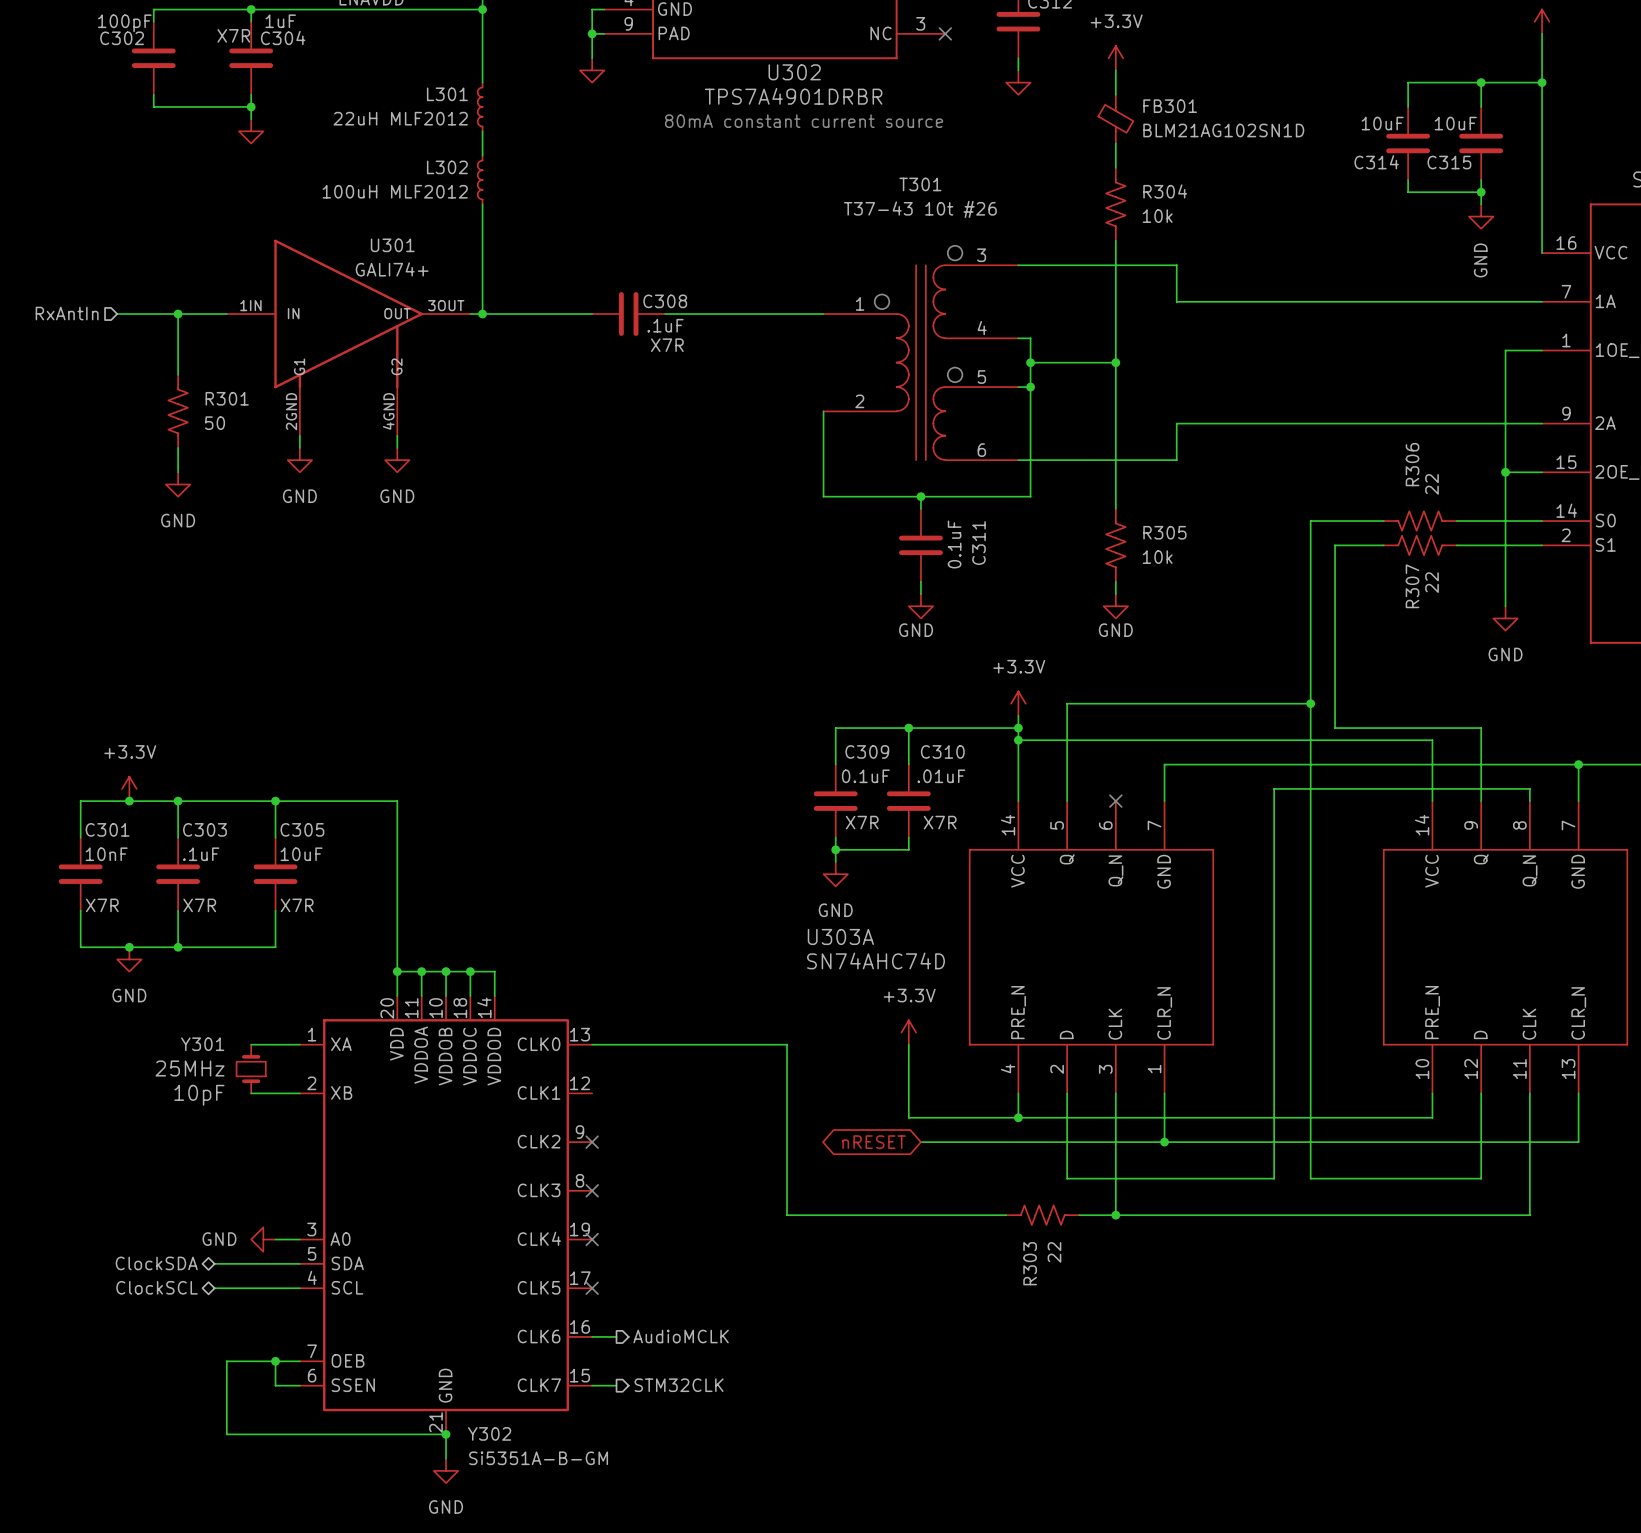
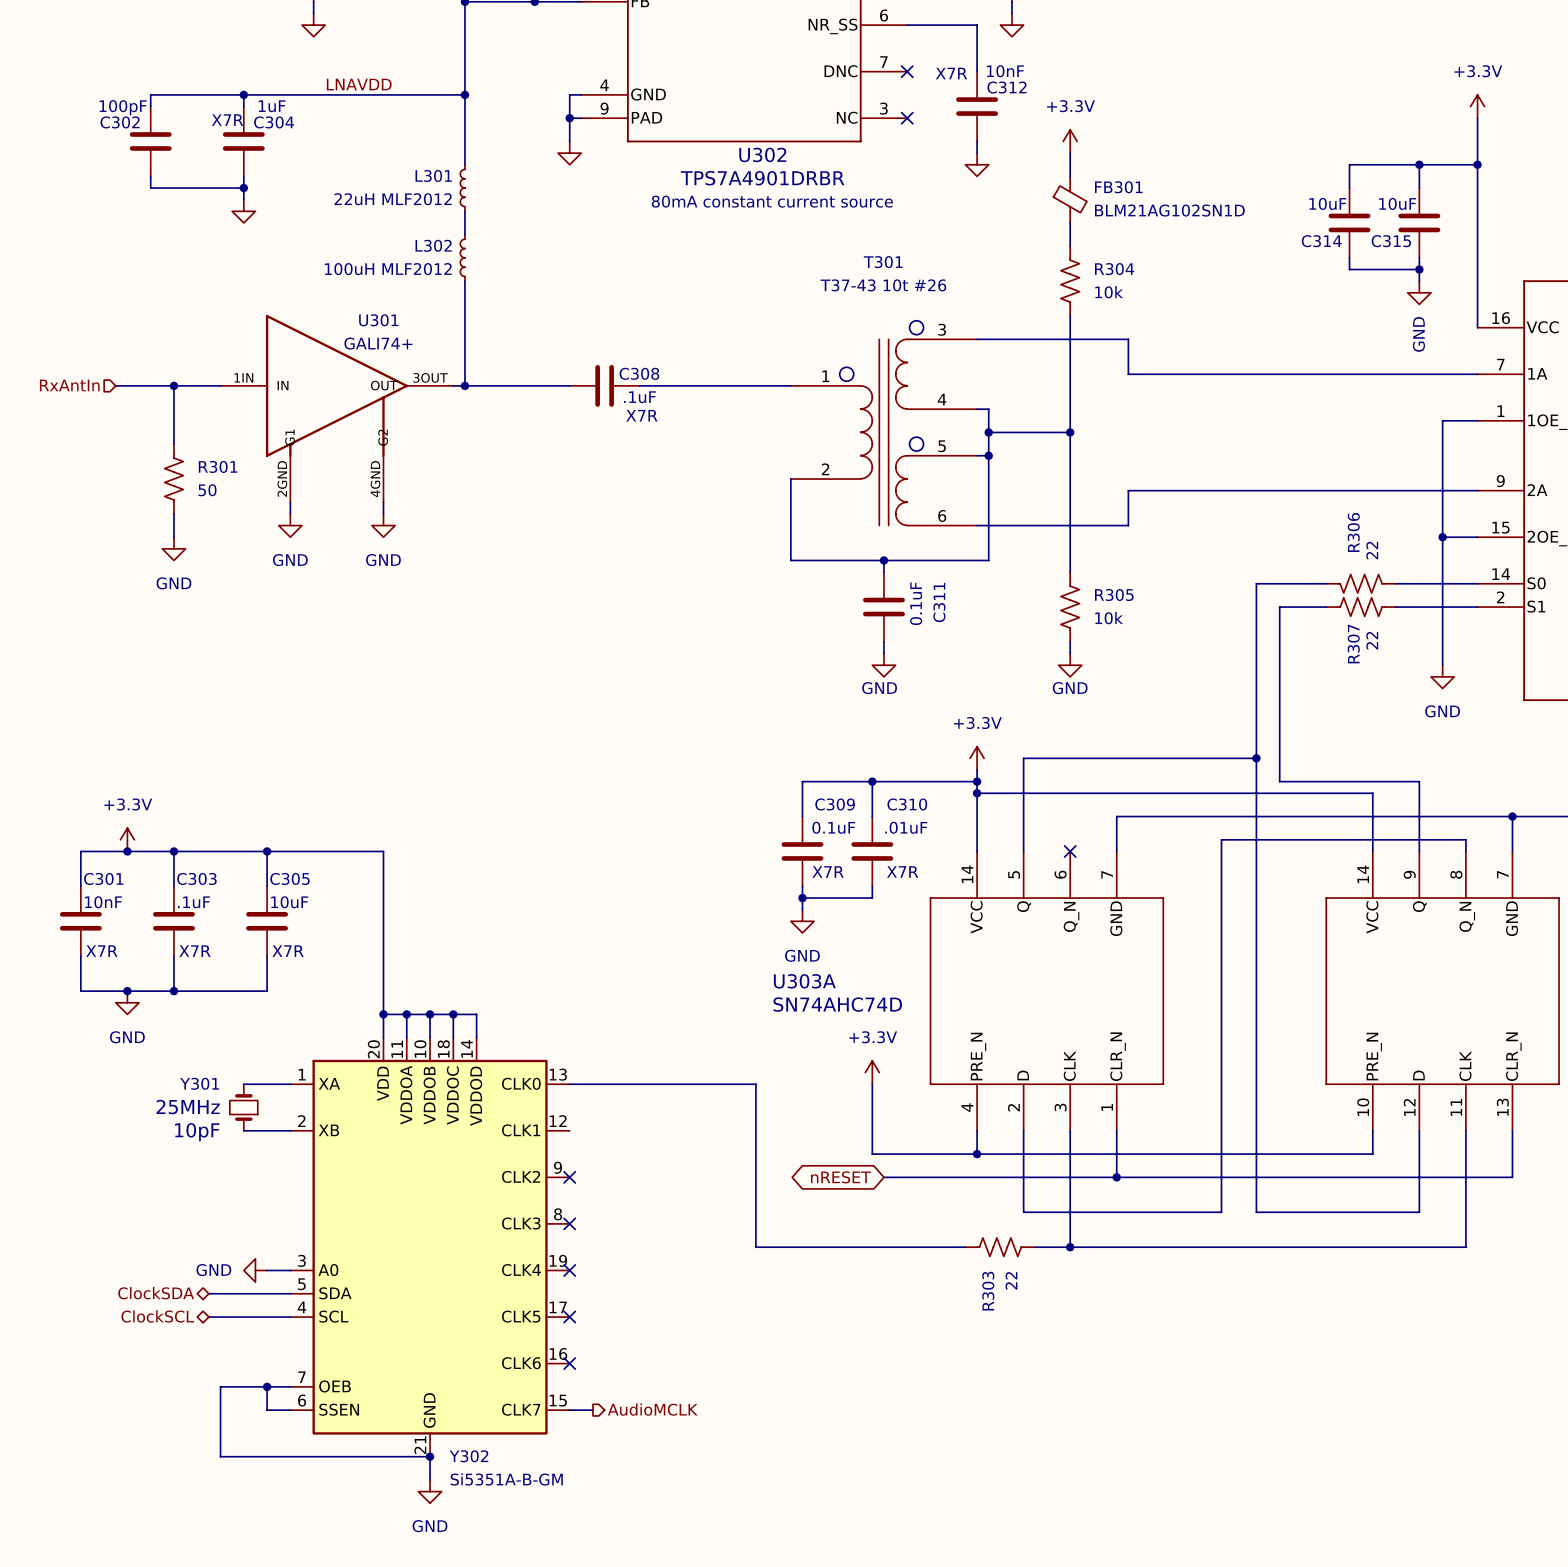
wire: (592, 1336) (616, 1336) -> none
no-connect mark: none -> (569, 1363)
hierarchical label: AudioMCLK (681, 1336) -> none
hierarchical label: STM32CLK (679, 1385) -> AudioMCLK (652, 1409)

